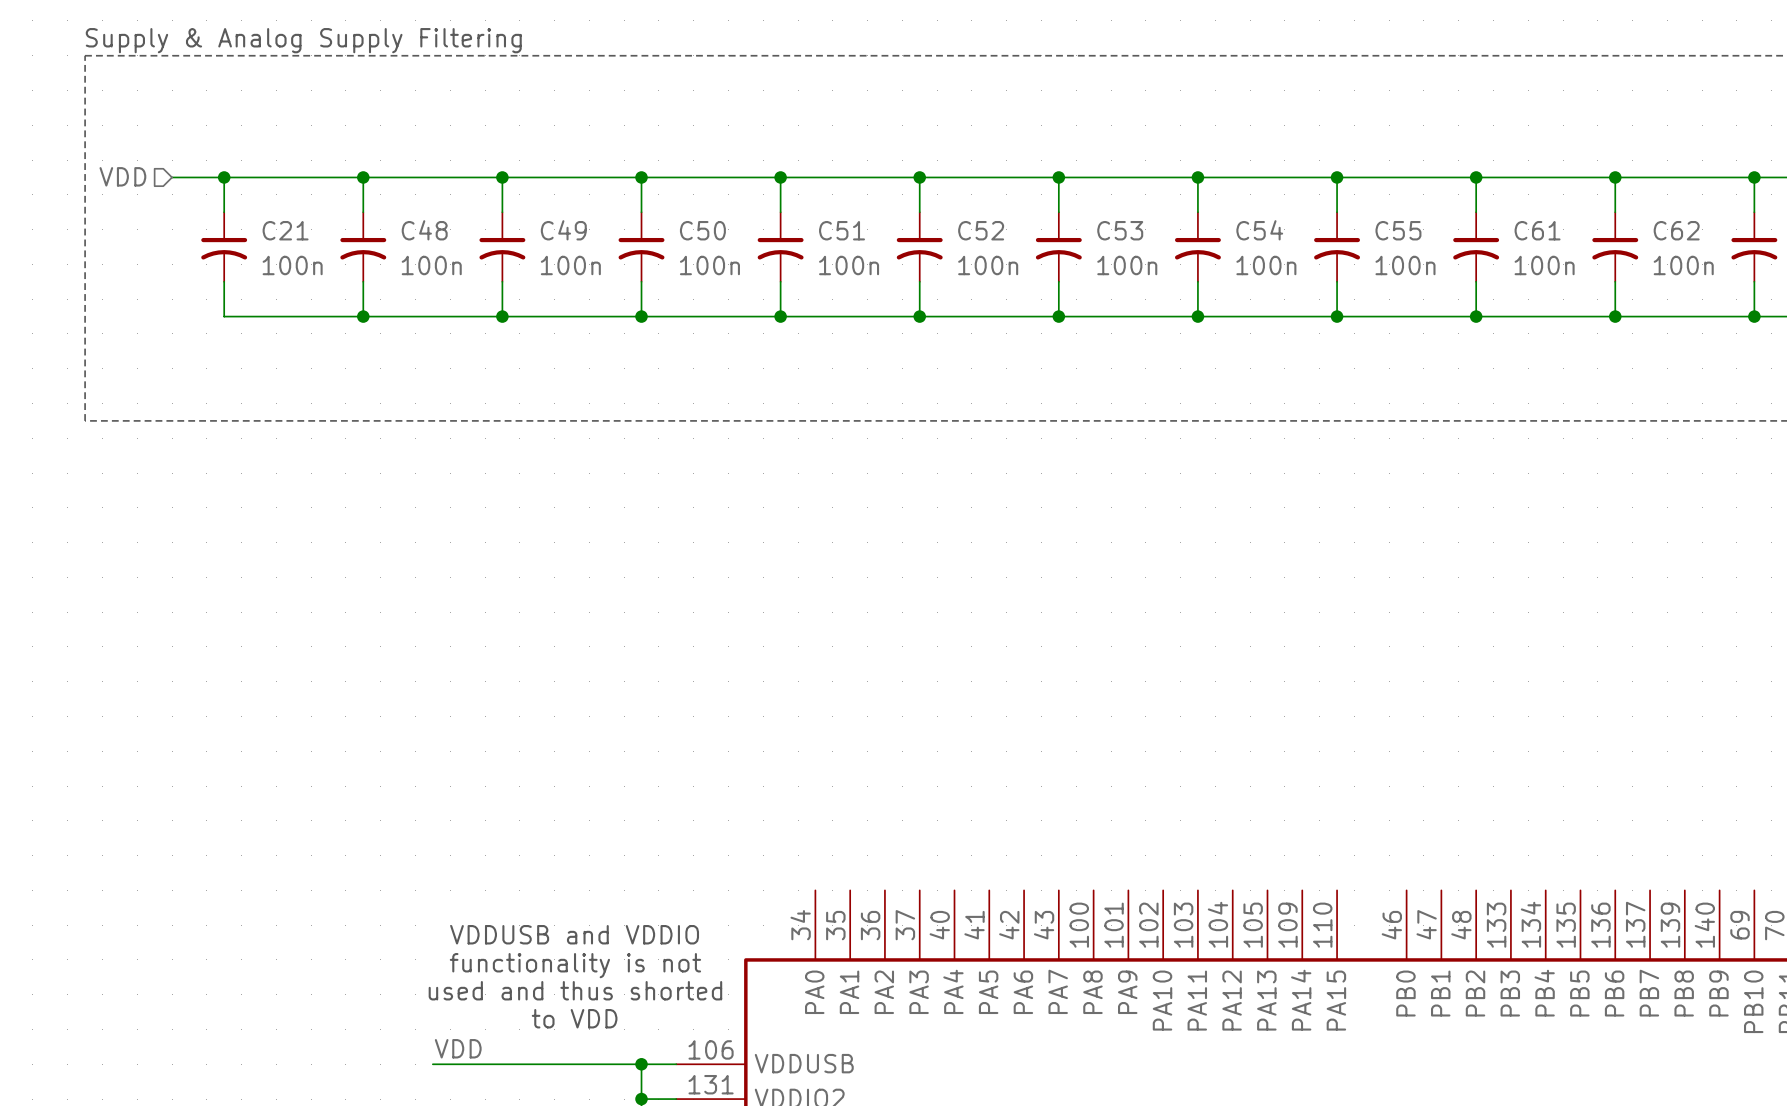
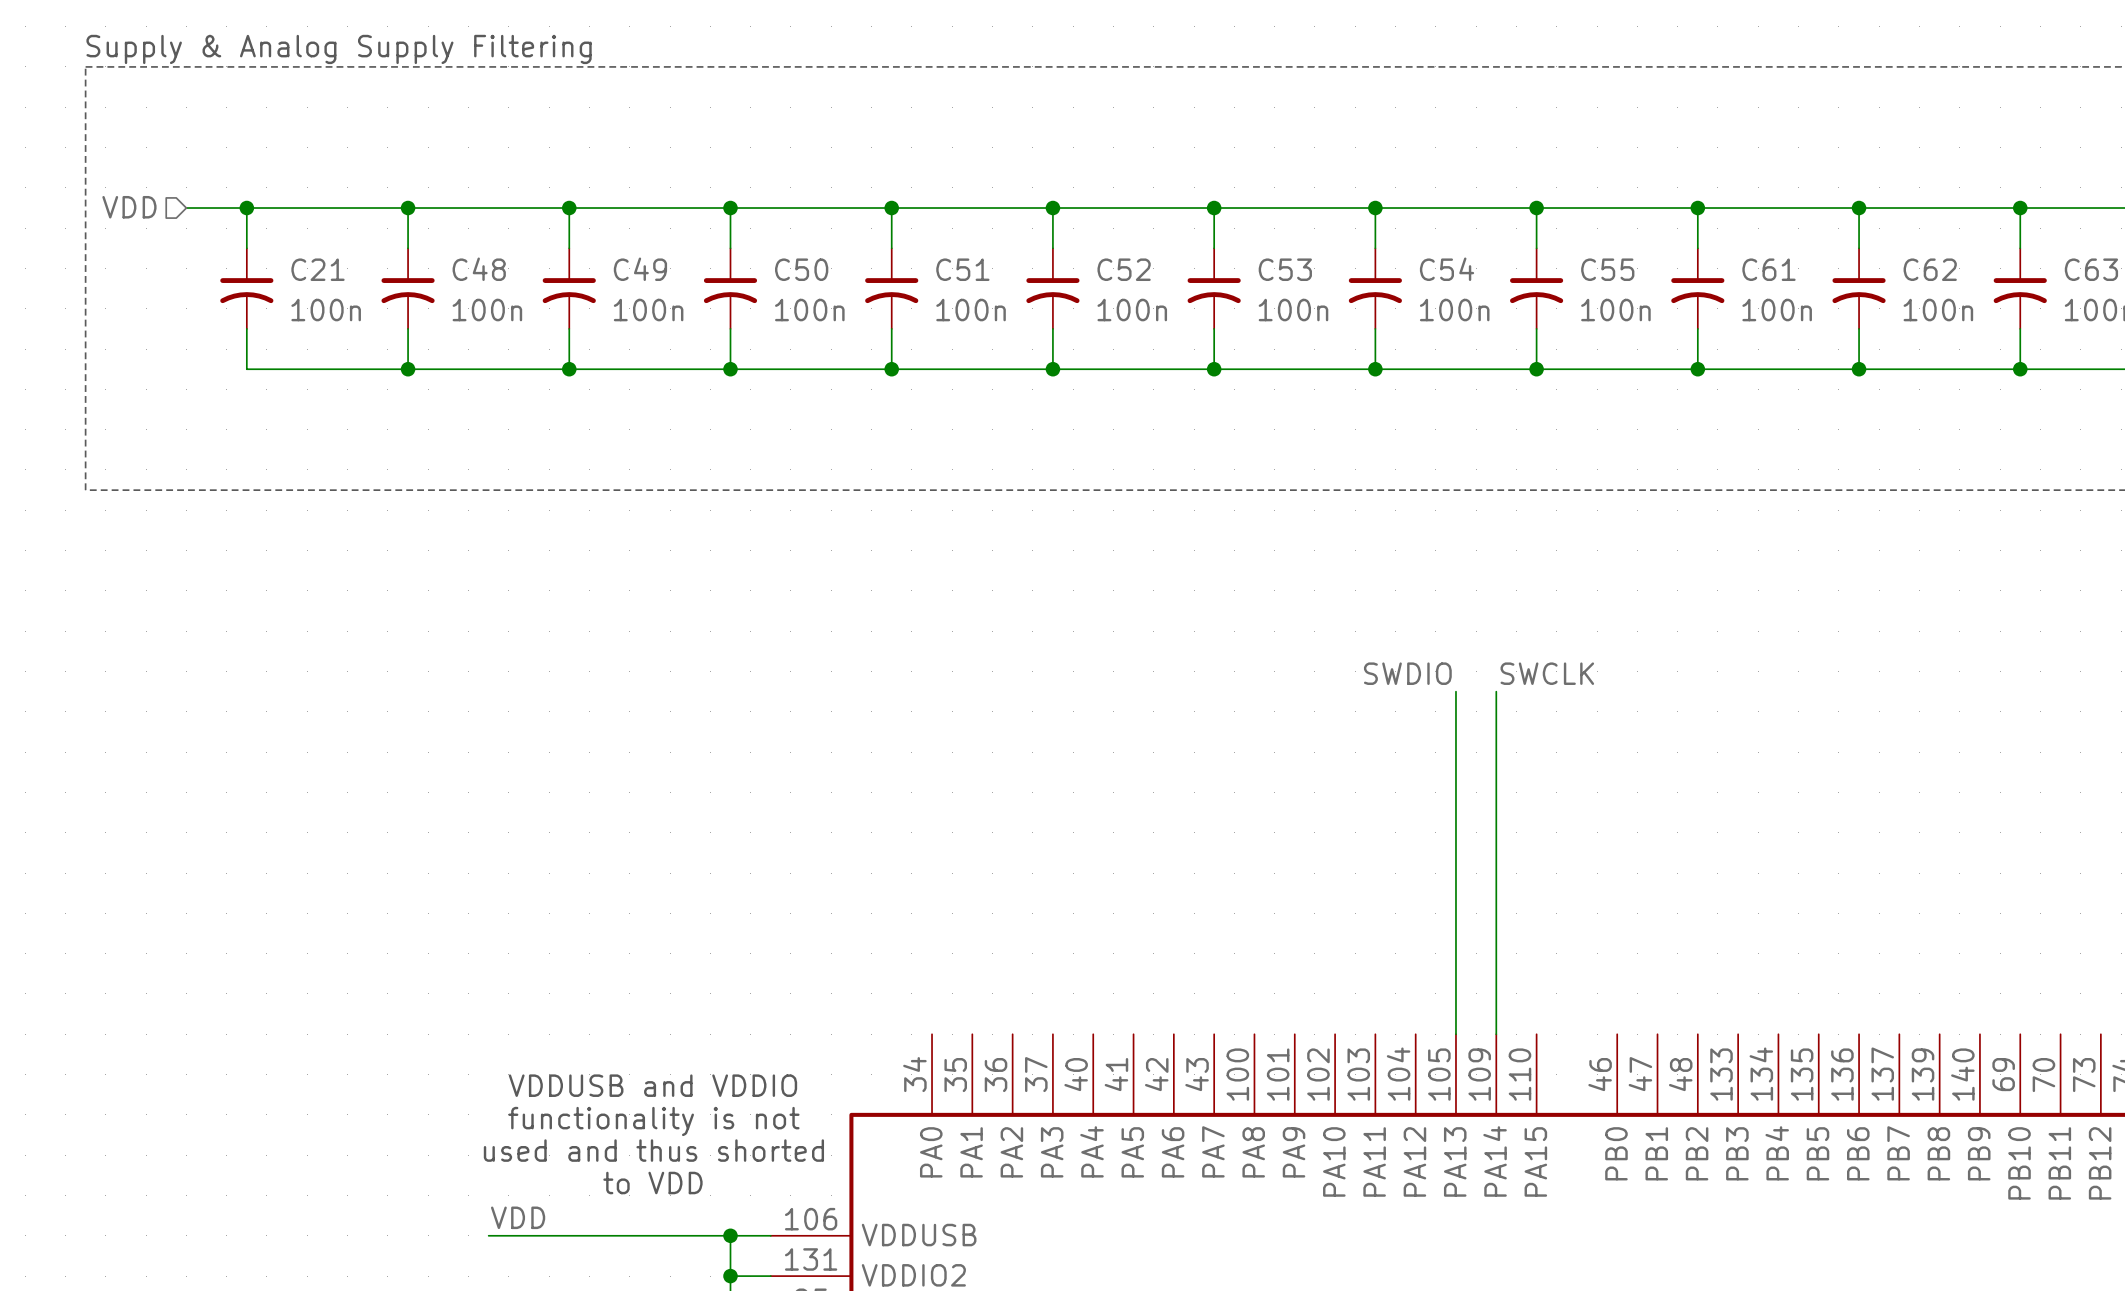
label: none -> SWDIO (1407, 673)
label: none -> SWCLK (1547, 673)
wire: none -> (1455, 691) (1455, 1034)
wire: none -> (1496, 691) (1496, 1034)

